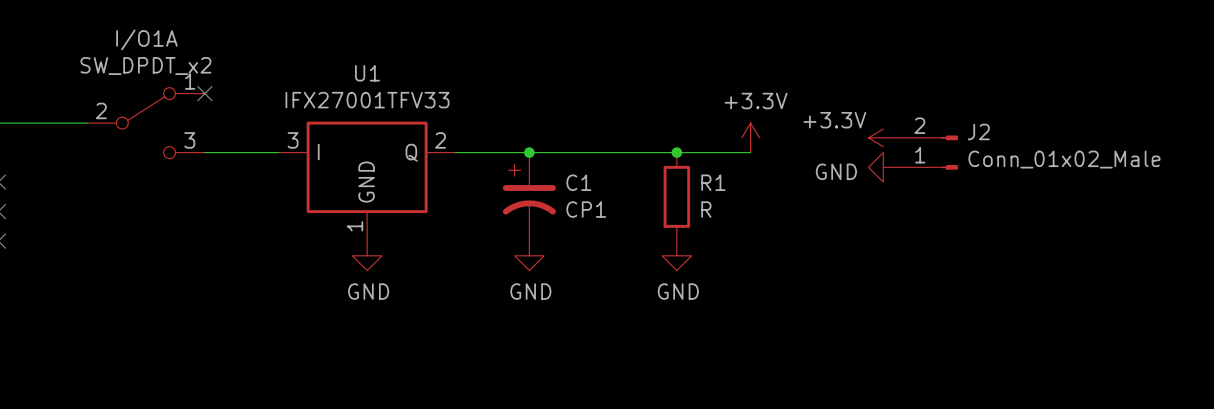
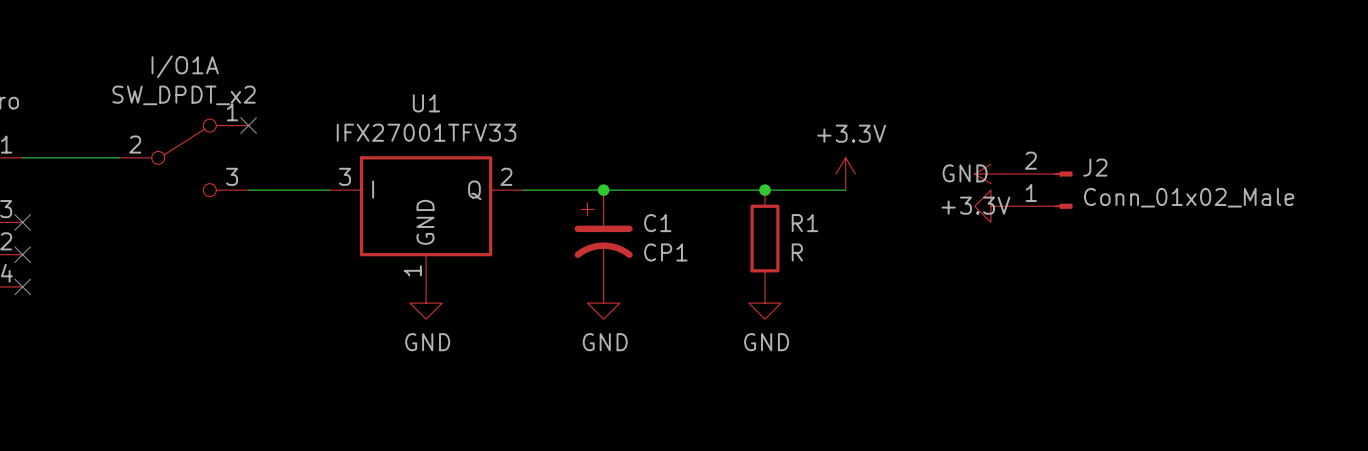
power symbol text position: +3.3V (834, 120) -> +3.3V (975, 205)
power symbol text position: GND (836, 171) -> GND (965, 173)

